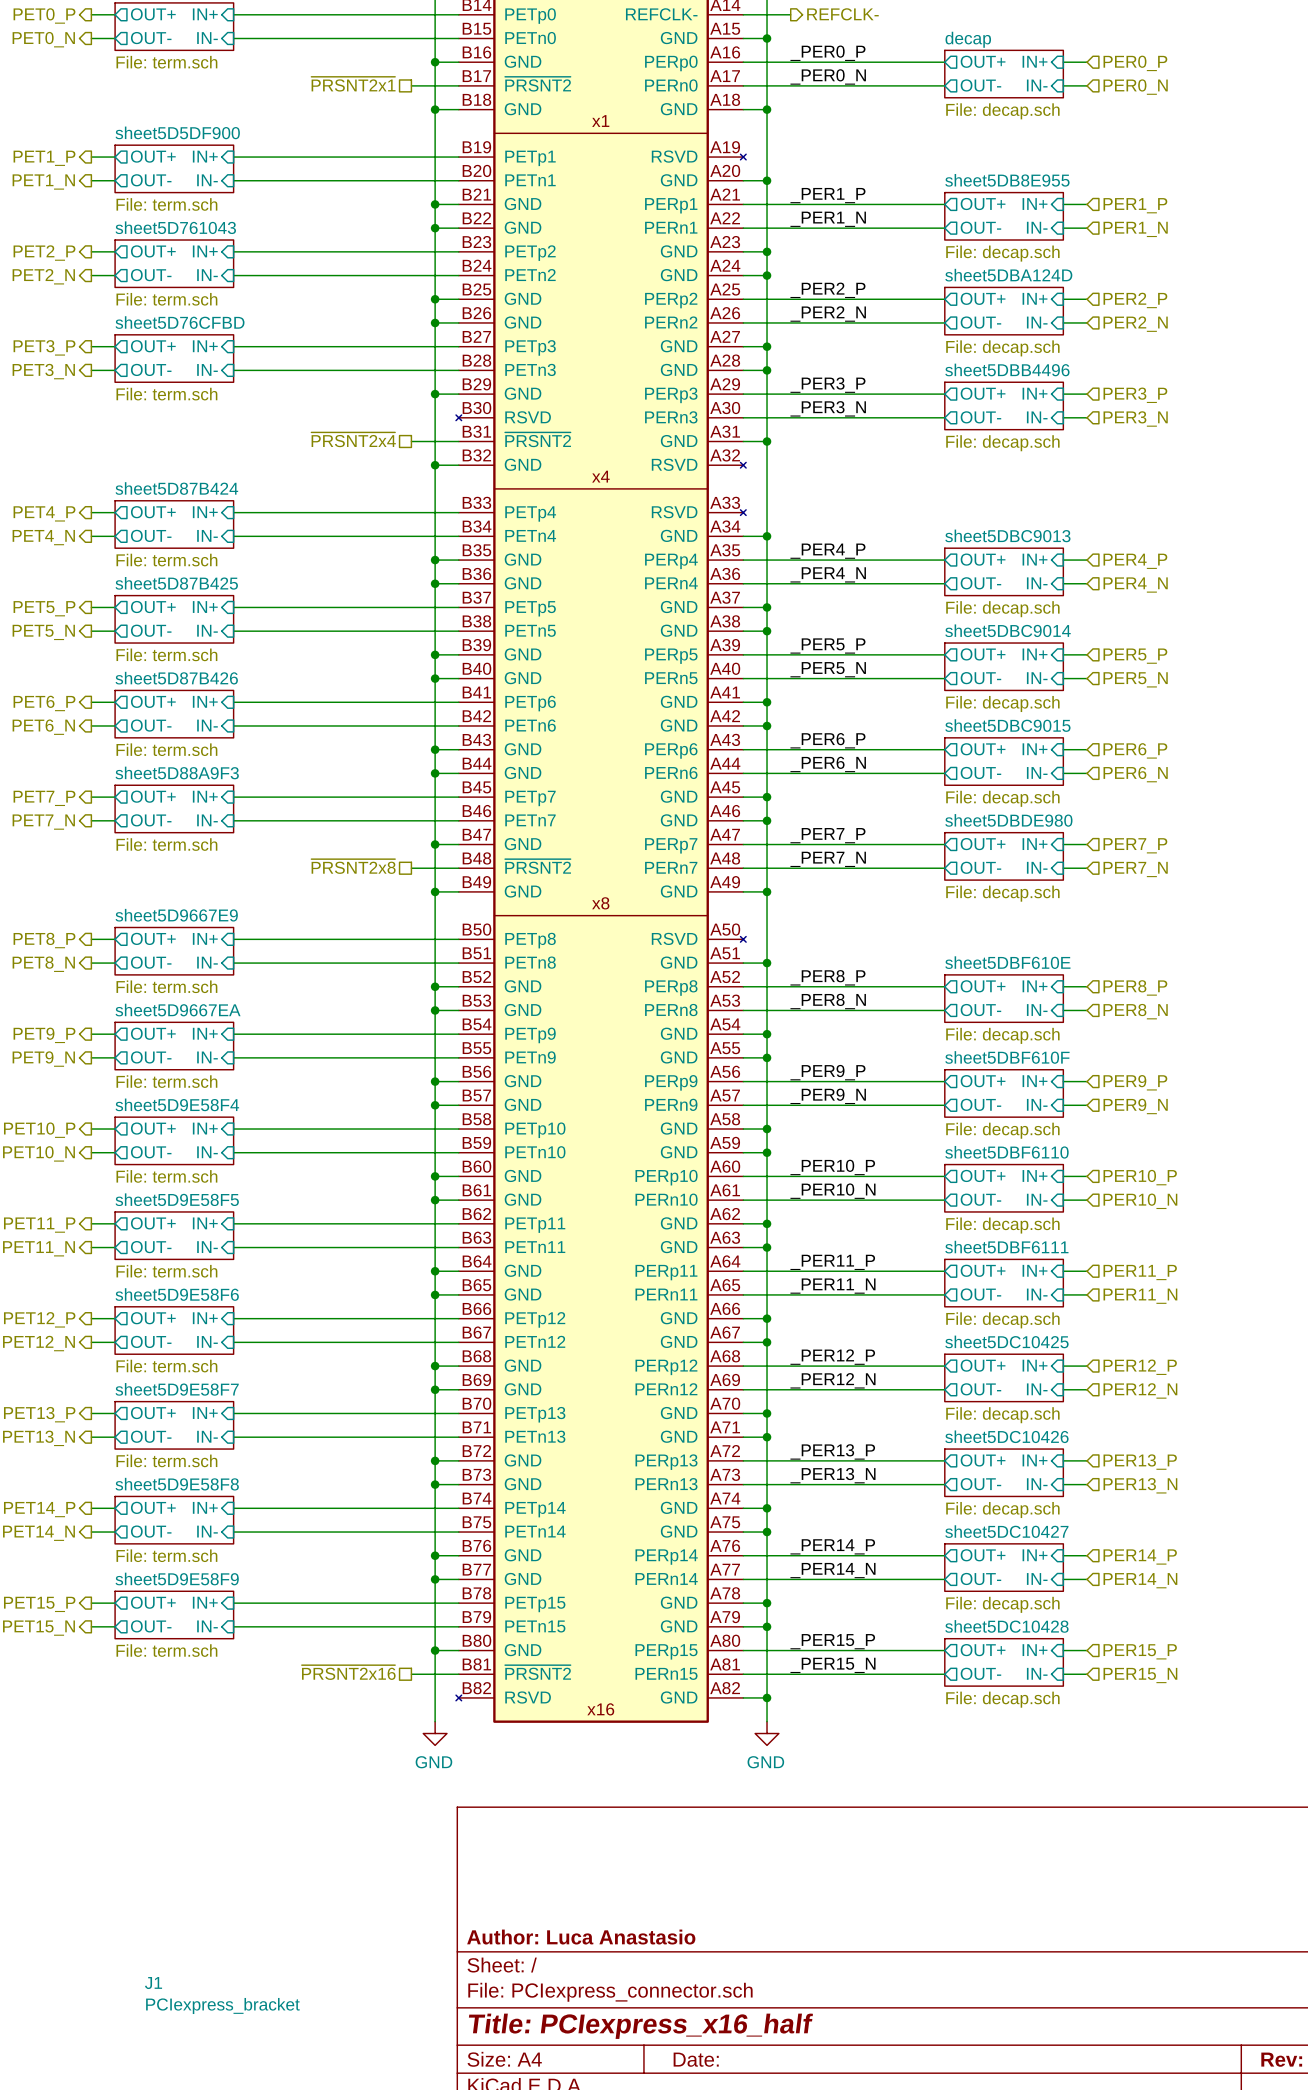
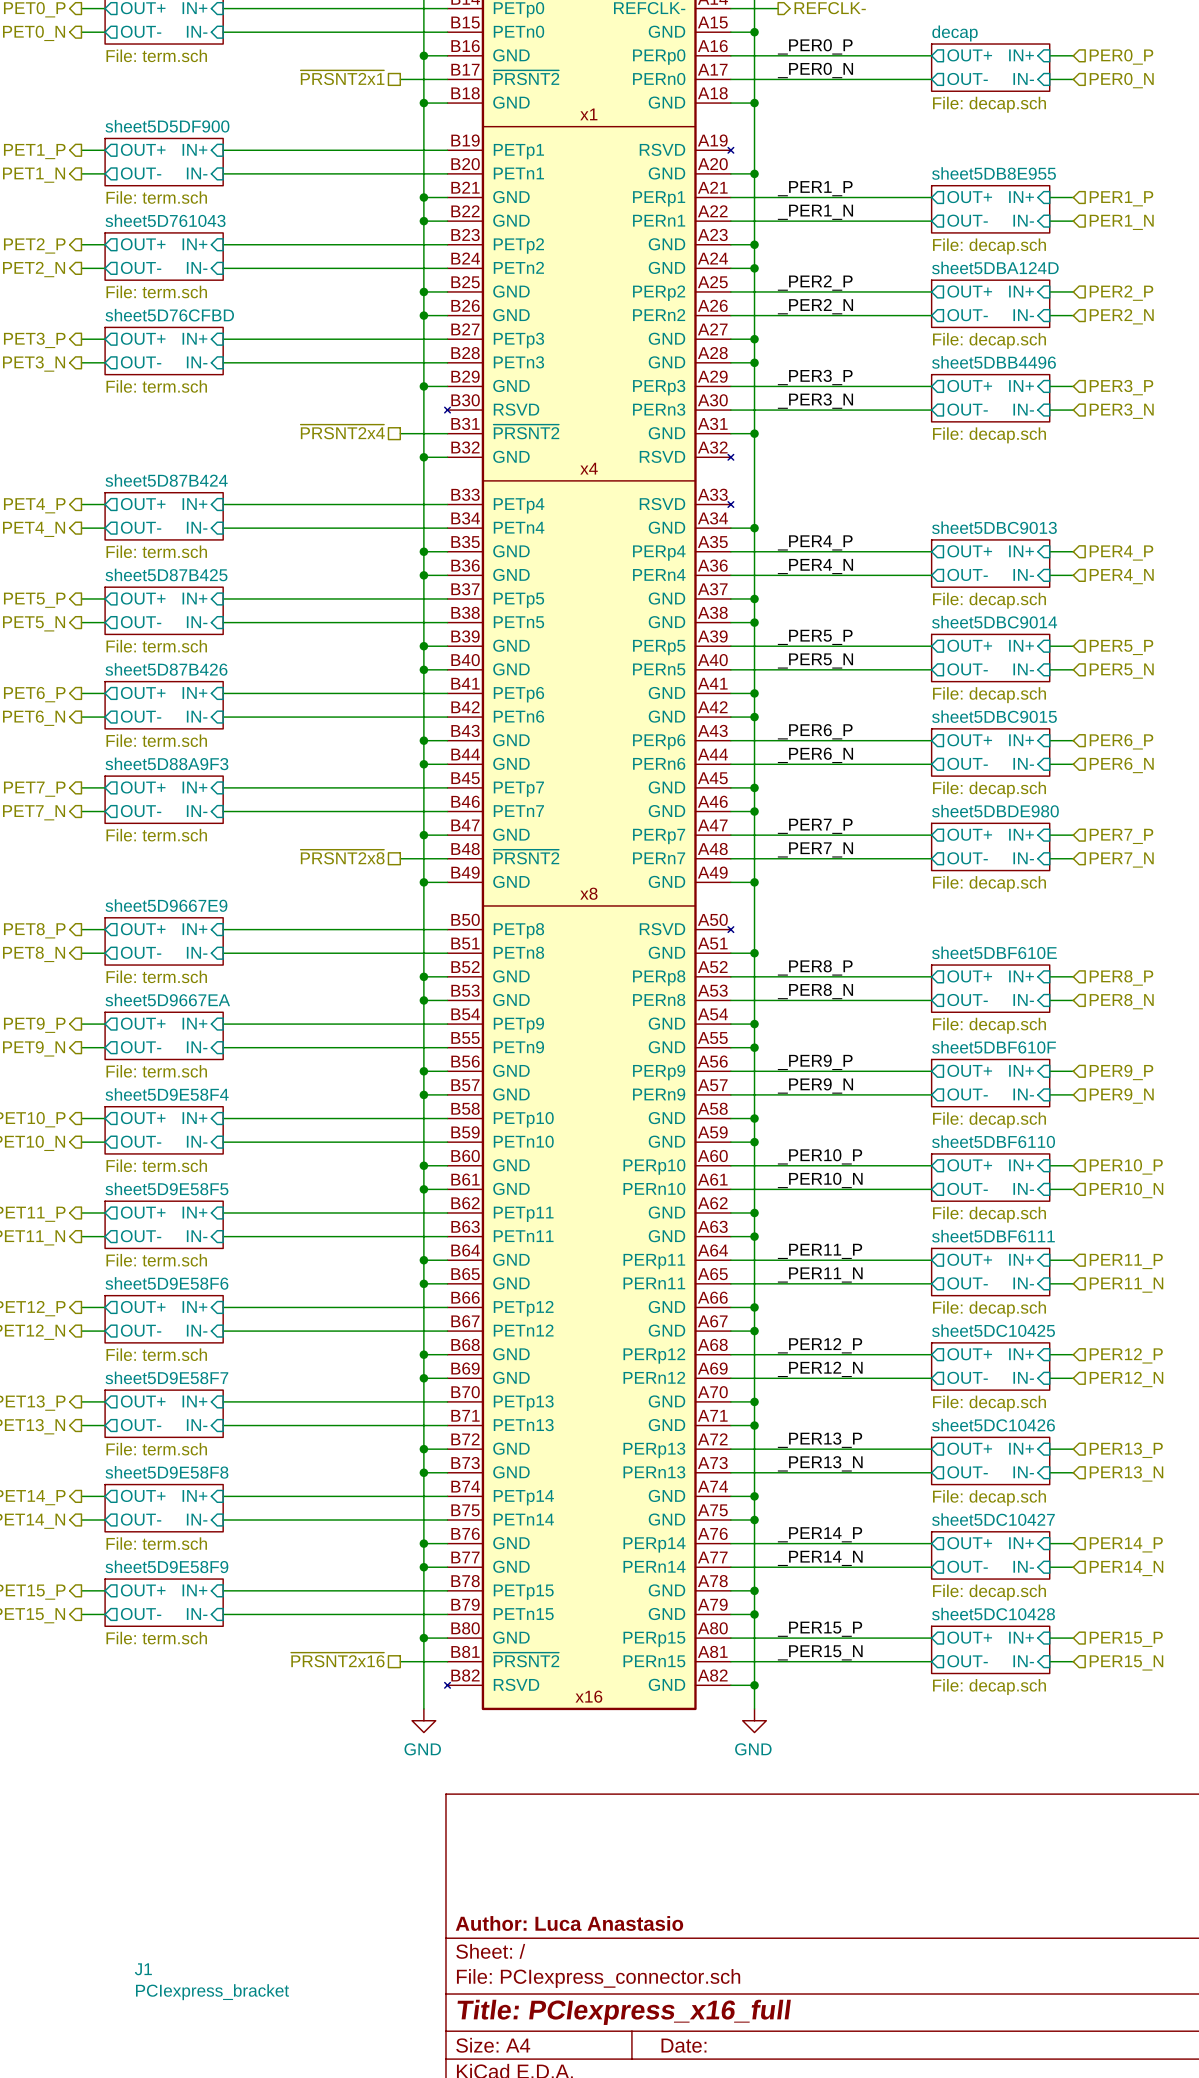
title block: Title: PCIexpress_x16_half (640, 2026) -> Title: PCIexpress_x16_full (624, 2012)

